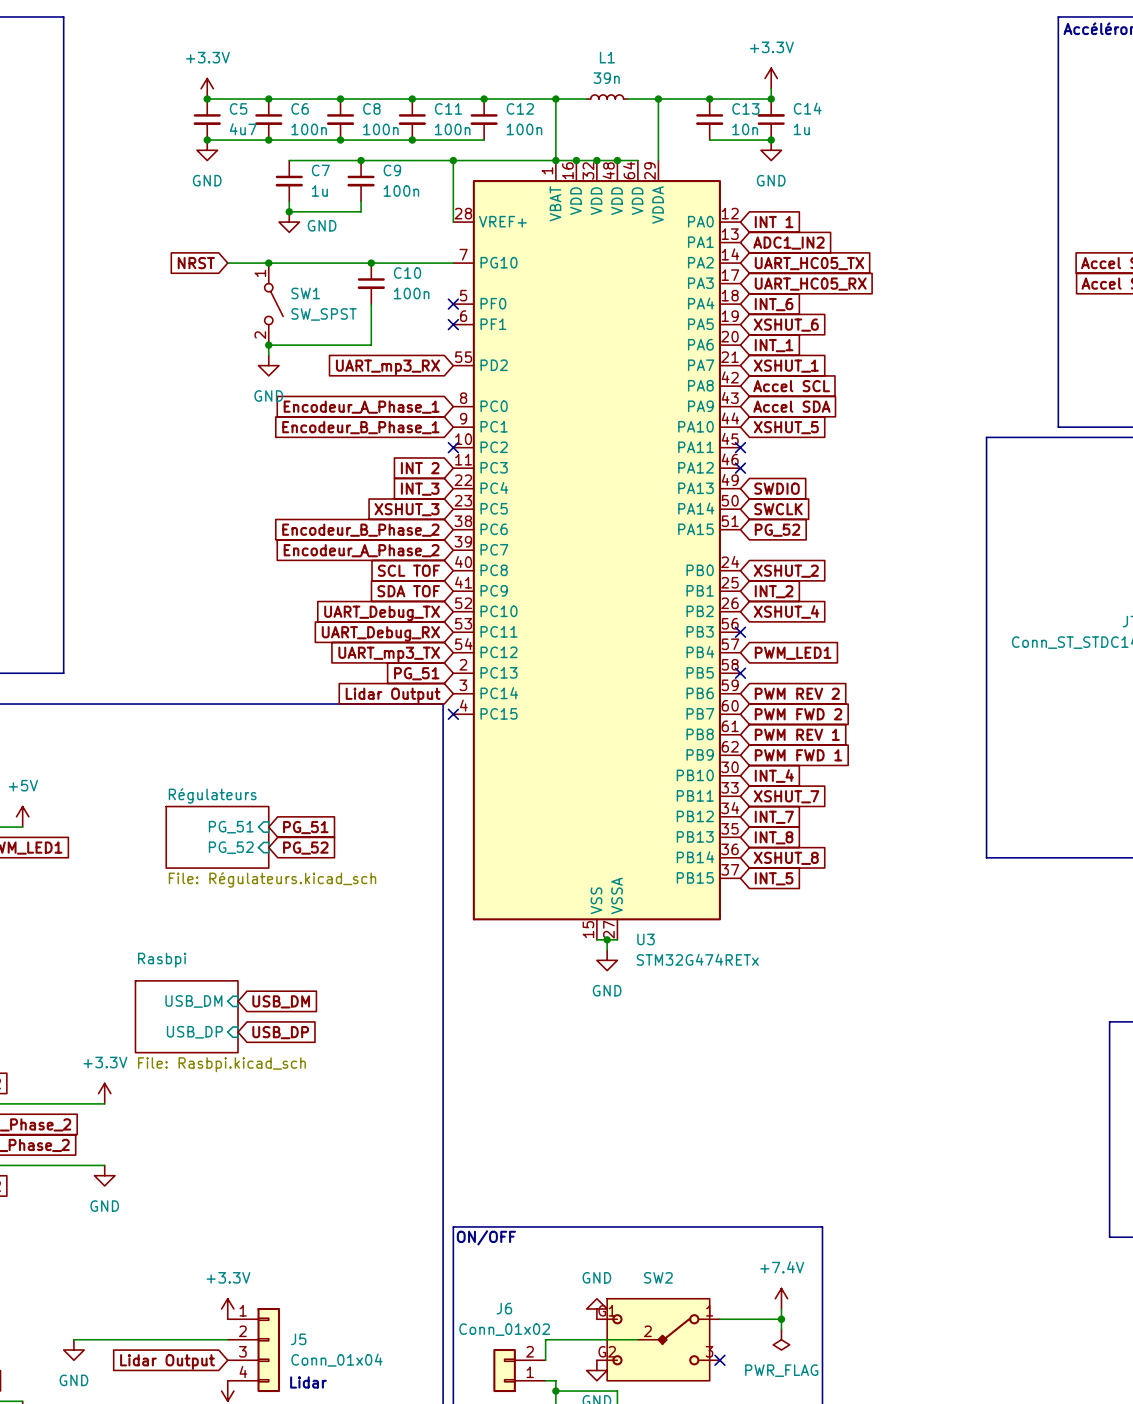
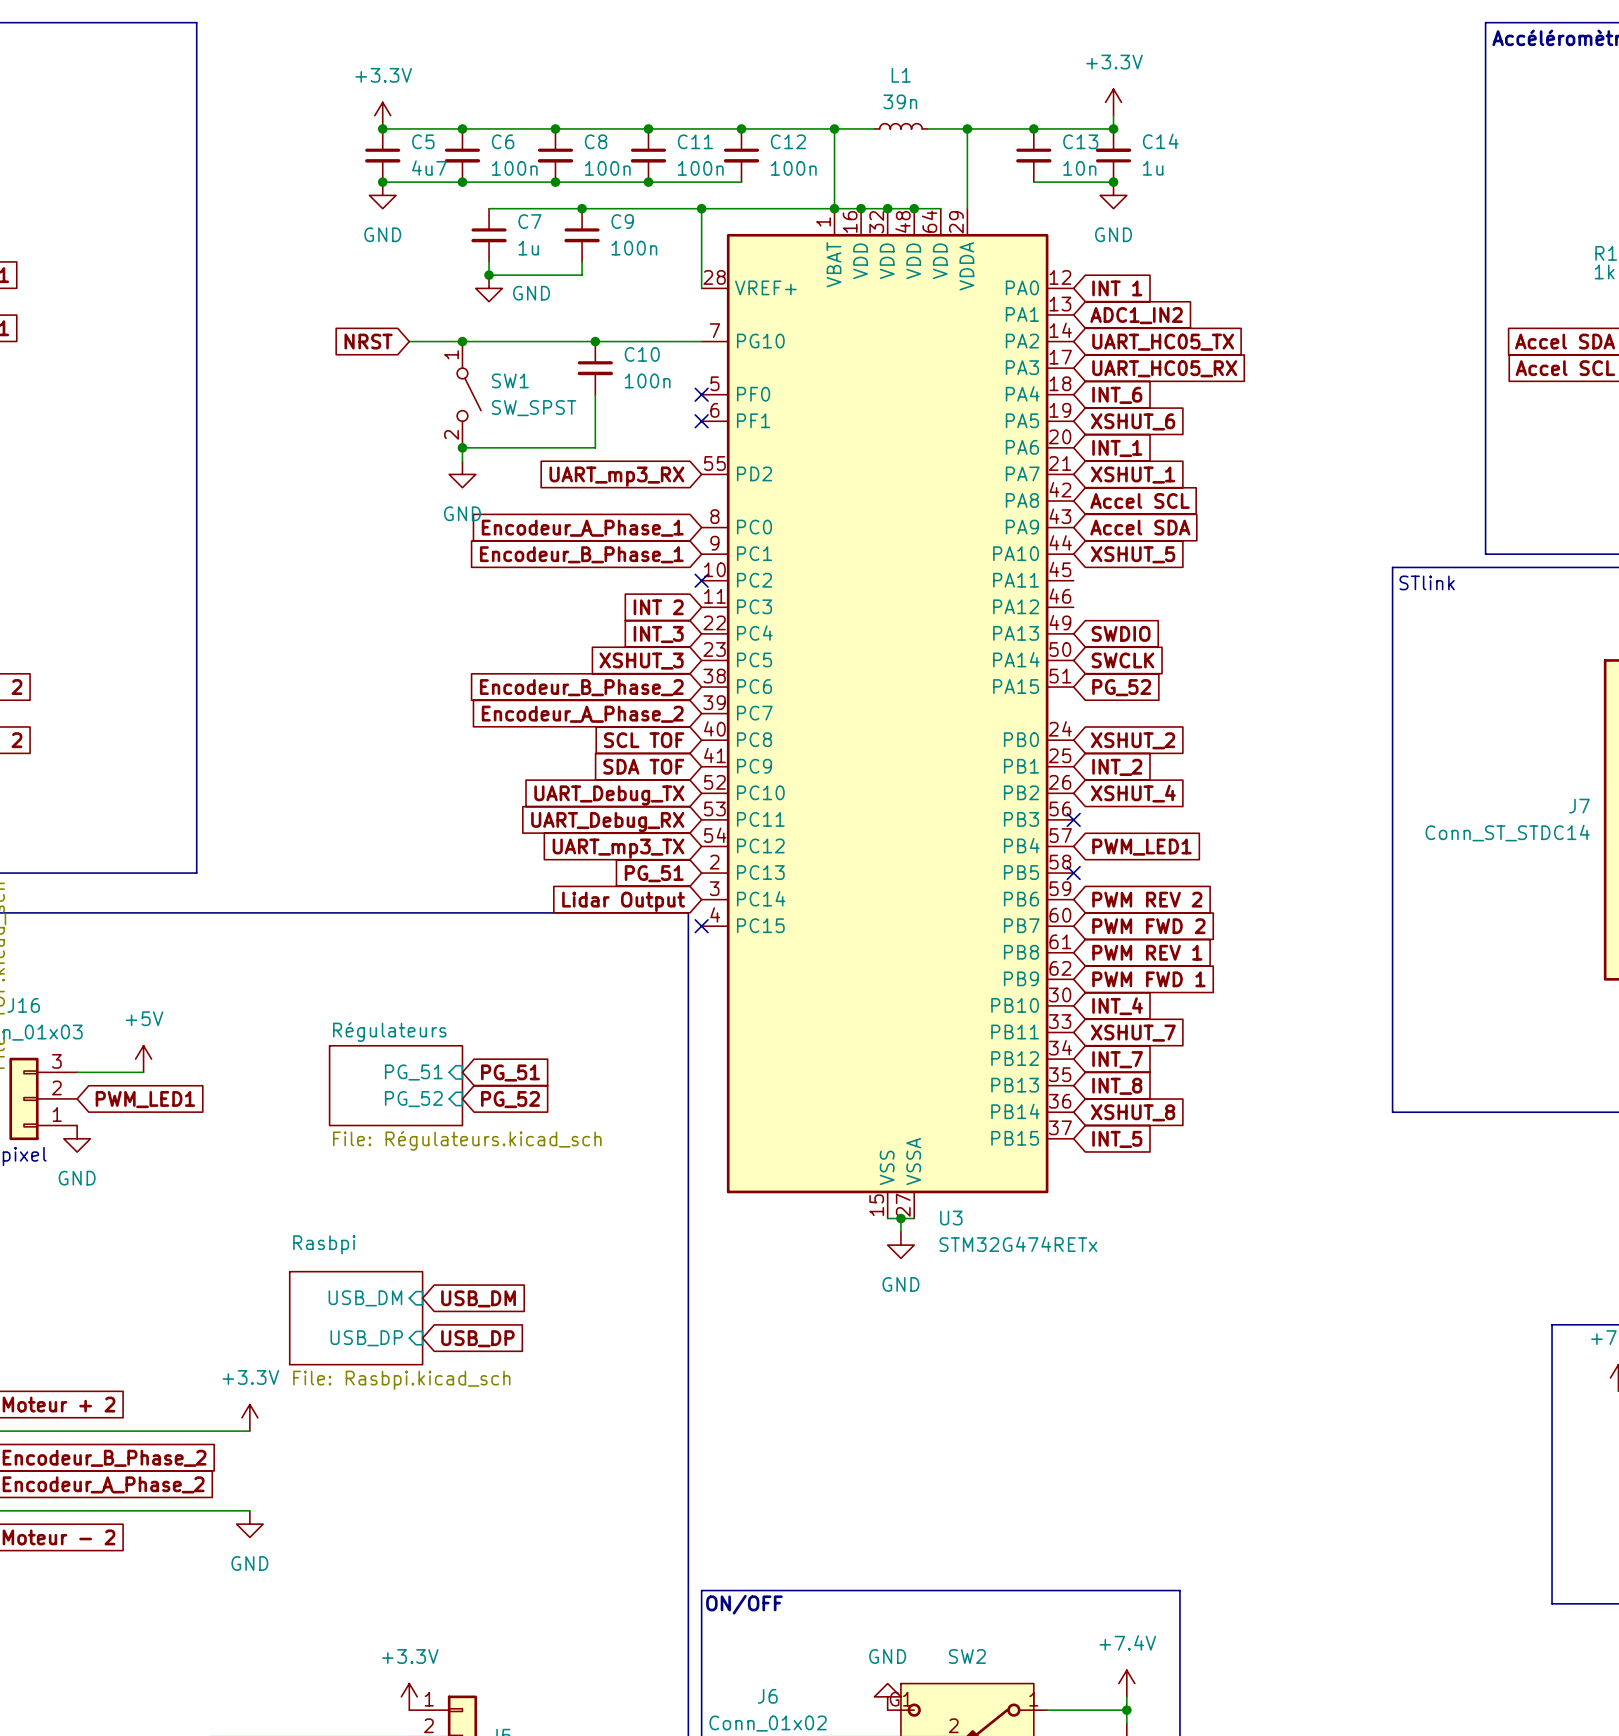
no-connect mark: (740, 447) -> none
text: none -> STlink (1427, 582)
no-connect mark: (740, 468) -> none

